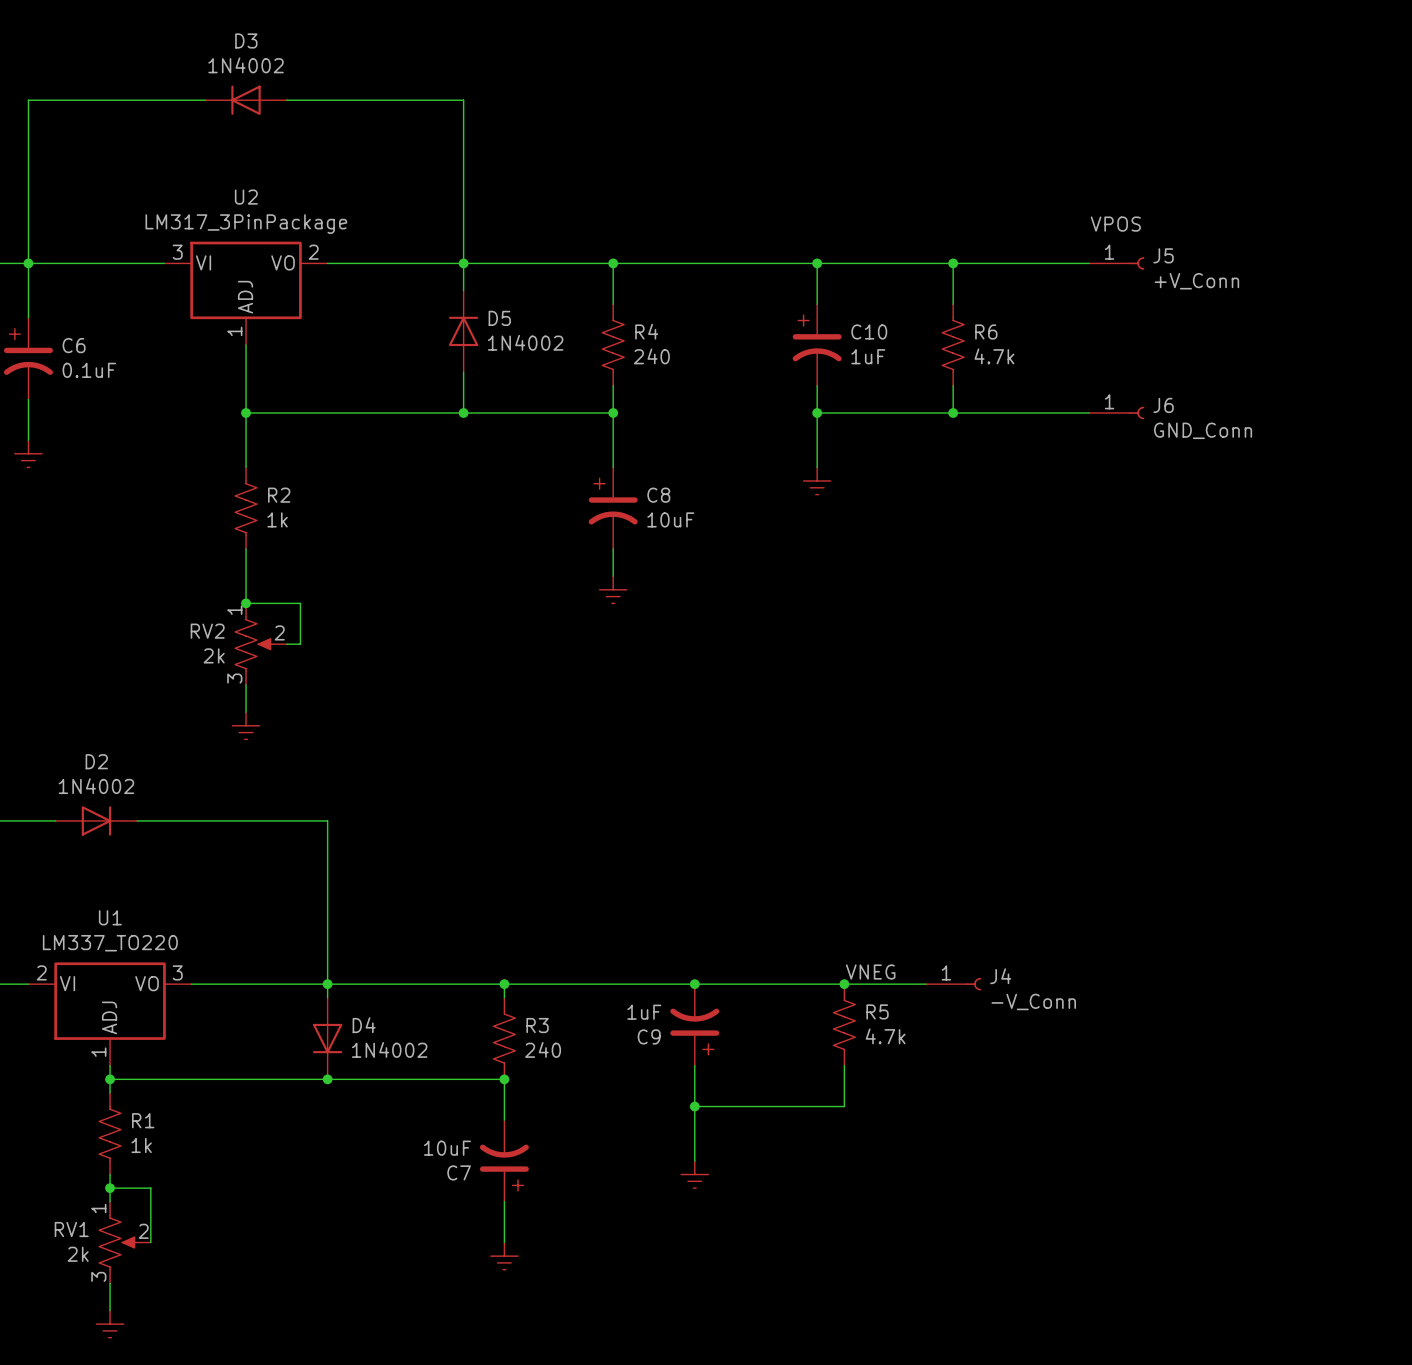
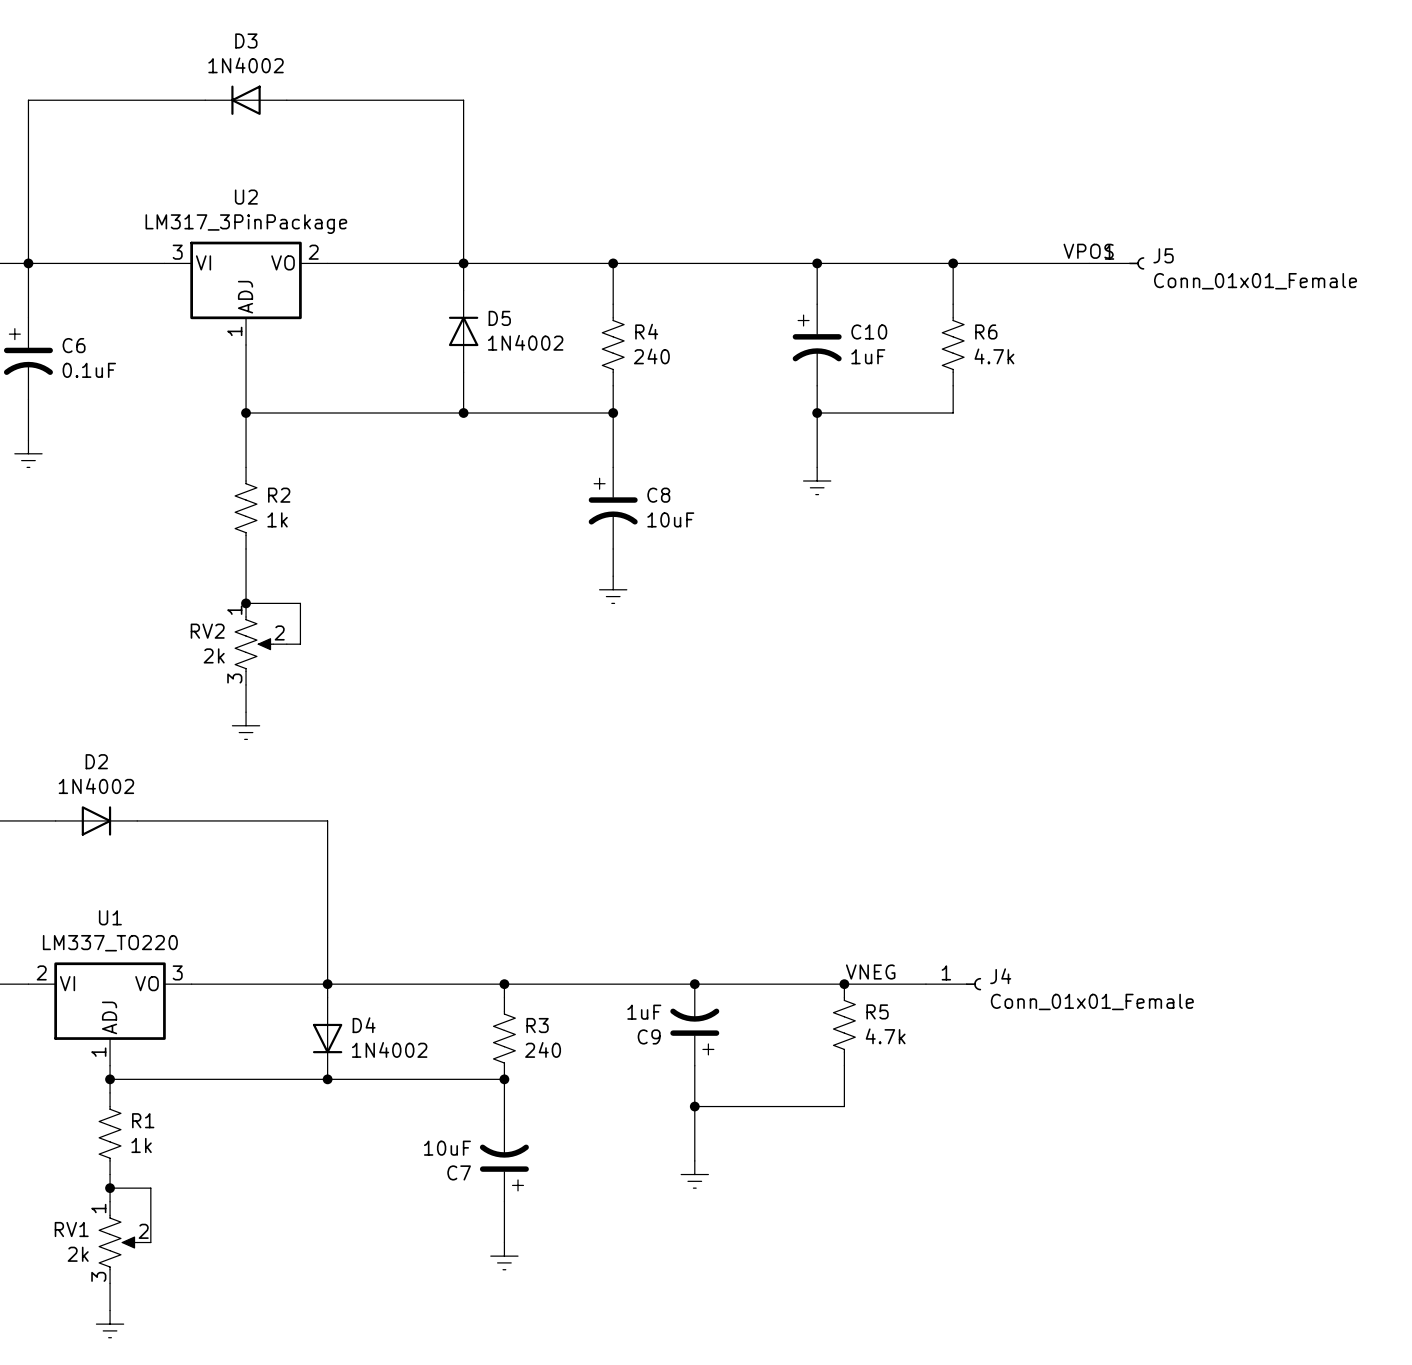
label position: VPOS (1115, 224) -> VPOS (1088, 251)
J5 value: +V_Conn (1196, 281) -> Conn_01x01_Female (1255, 281)
wire: (953, 413) (1089, 413) -> none
junction: (953, 413) -> none
J6: GND_Conn (1116, 413) -> none
J4 value: -V_Conn (1033, 1001) -> Conn_01x01_Female (1092, 1001)

